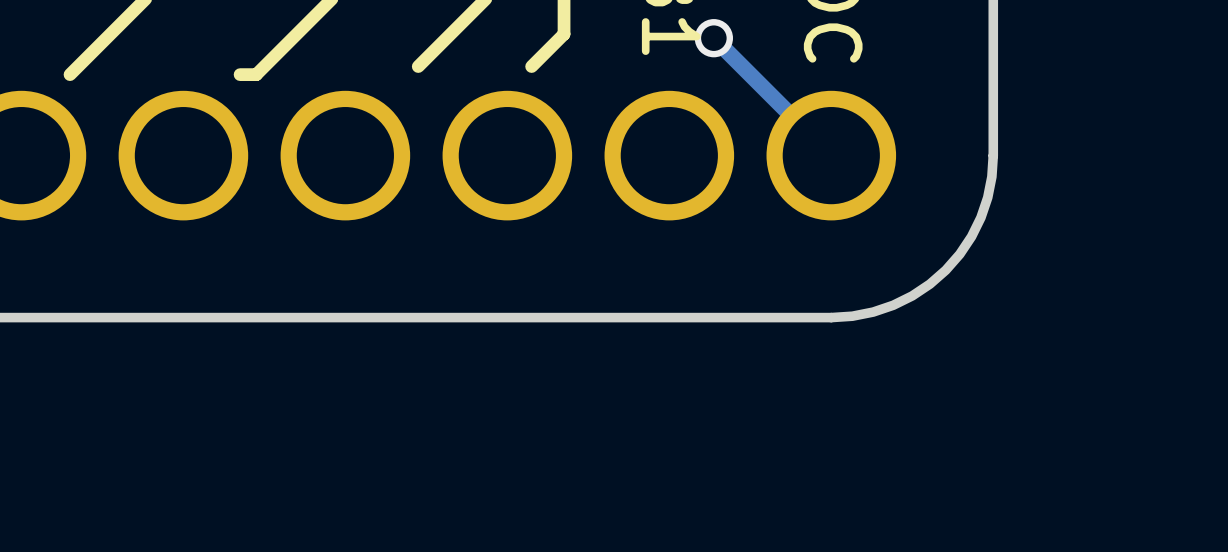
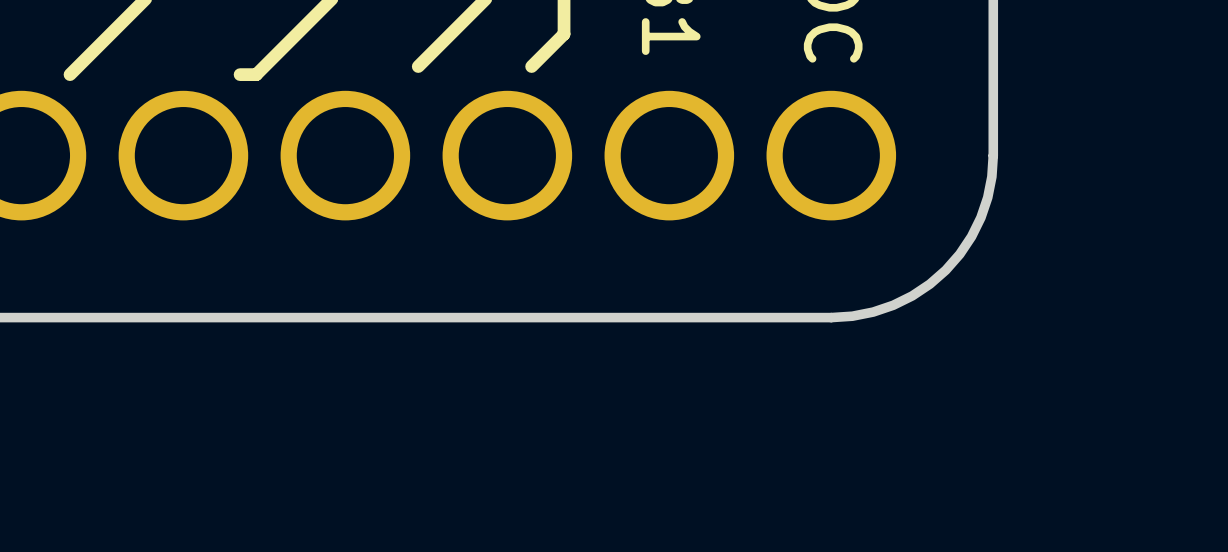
track: (713, 38) (831, 155) (831, 151) -> none
via: (713, 38) -> none

